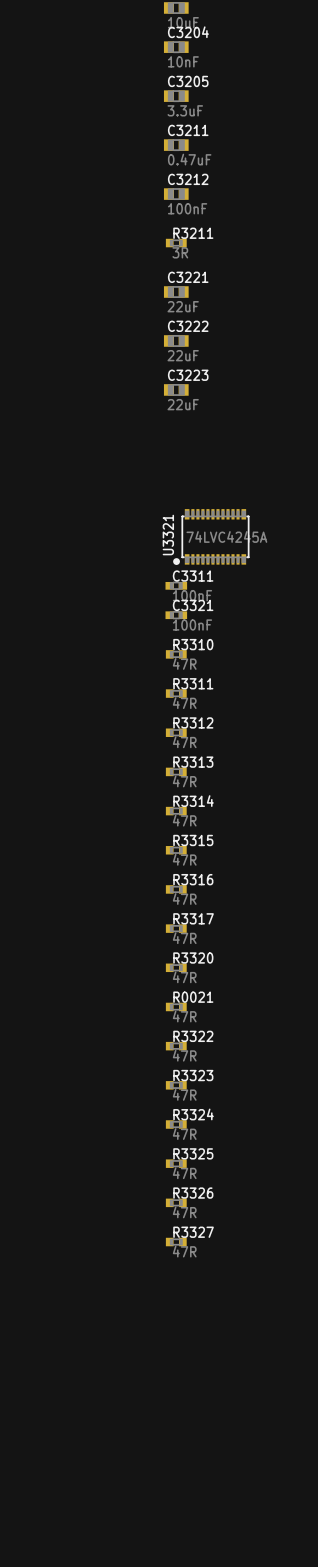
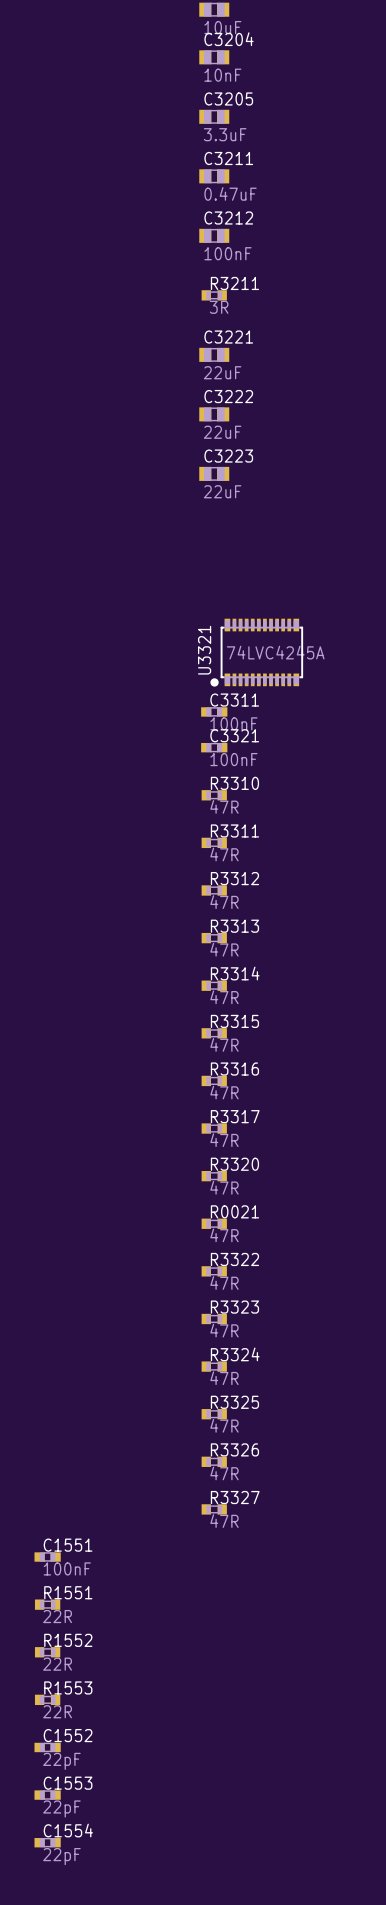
C1551: none -> 100nF (47, 1557)
R1551: none -> 22R (47, 1604)
R1552: none -> 22R (47, 1652)
R1553: none -> 22R (47, 1699)
C1552: none -> 22pF (47, 1747)
C1553: none -> 22pF (47, 1795)
C1554: none -> 22pF (47, 1842)

